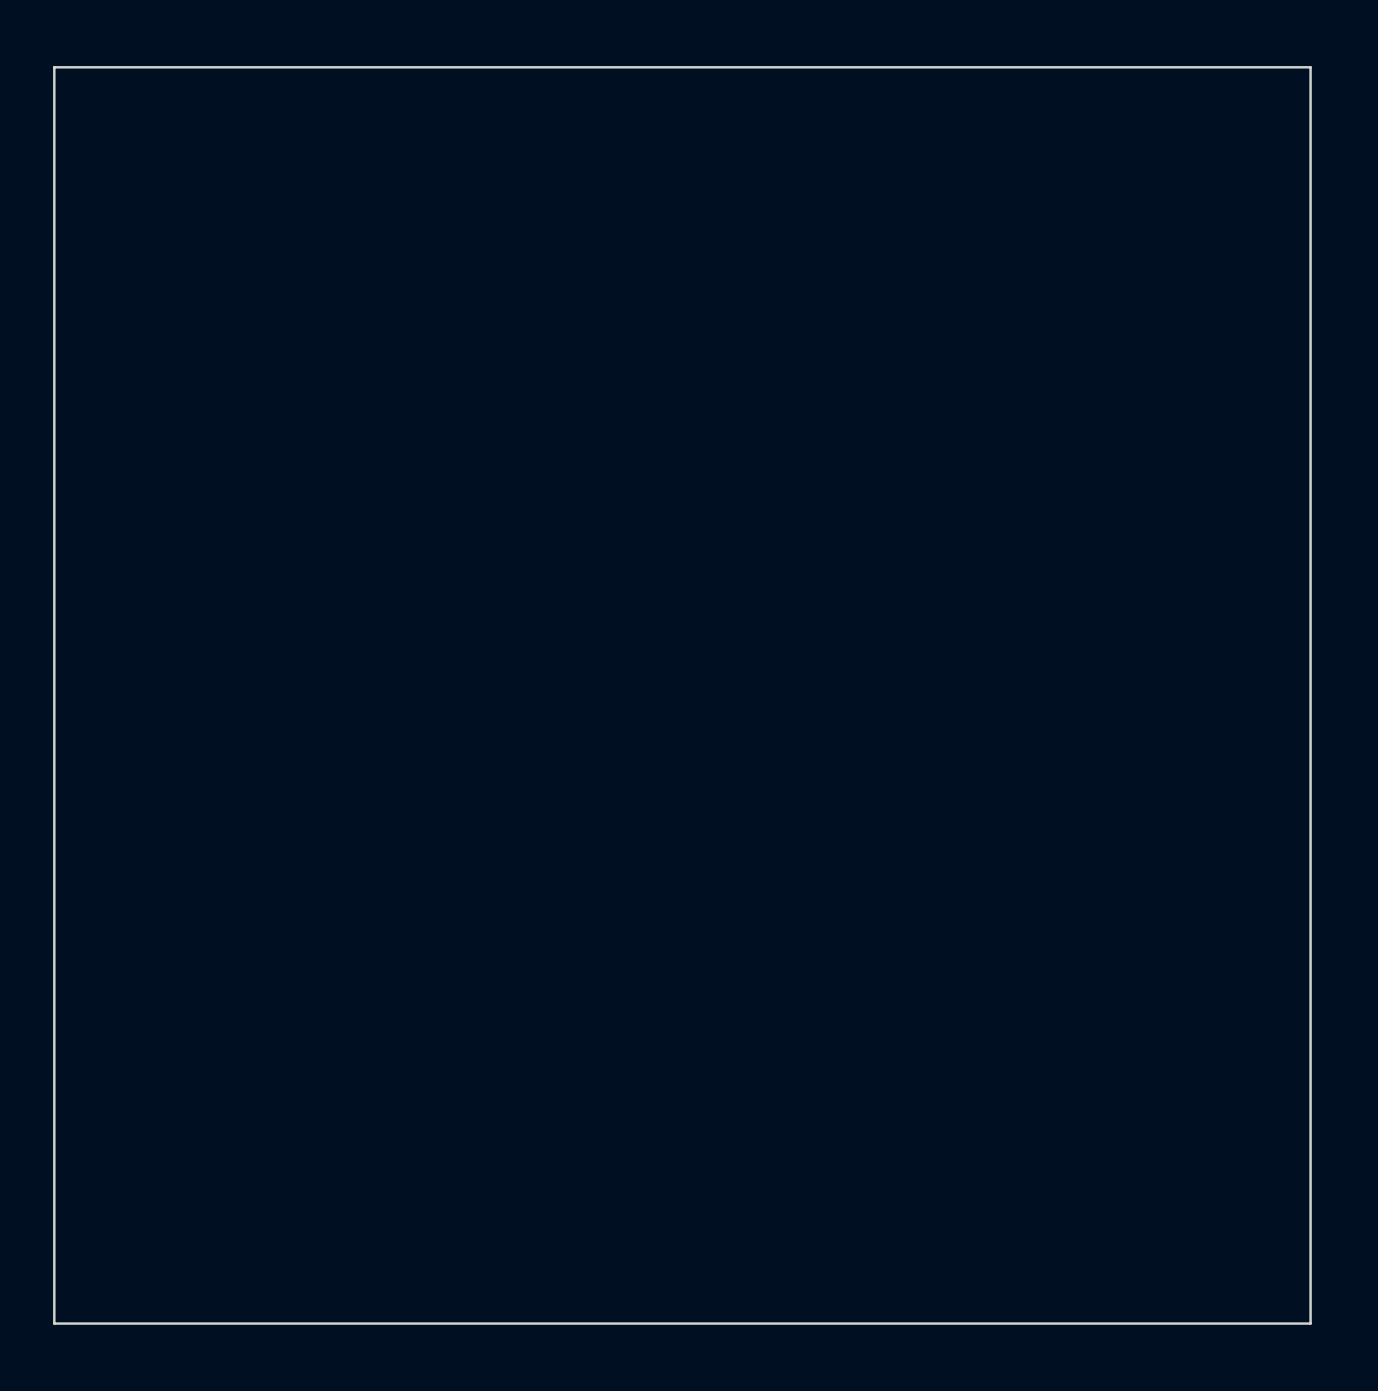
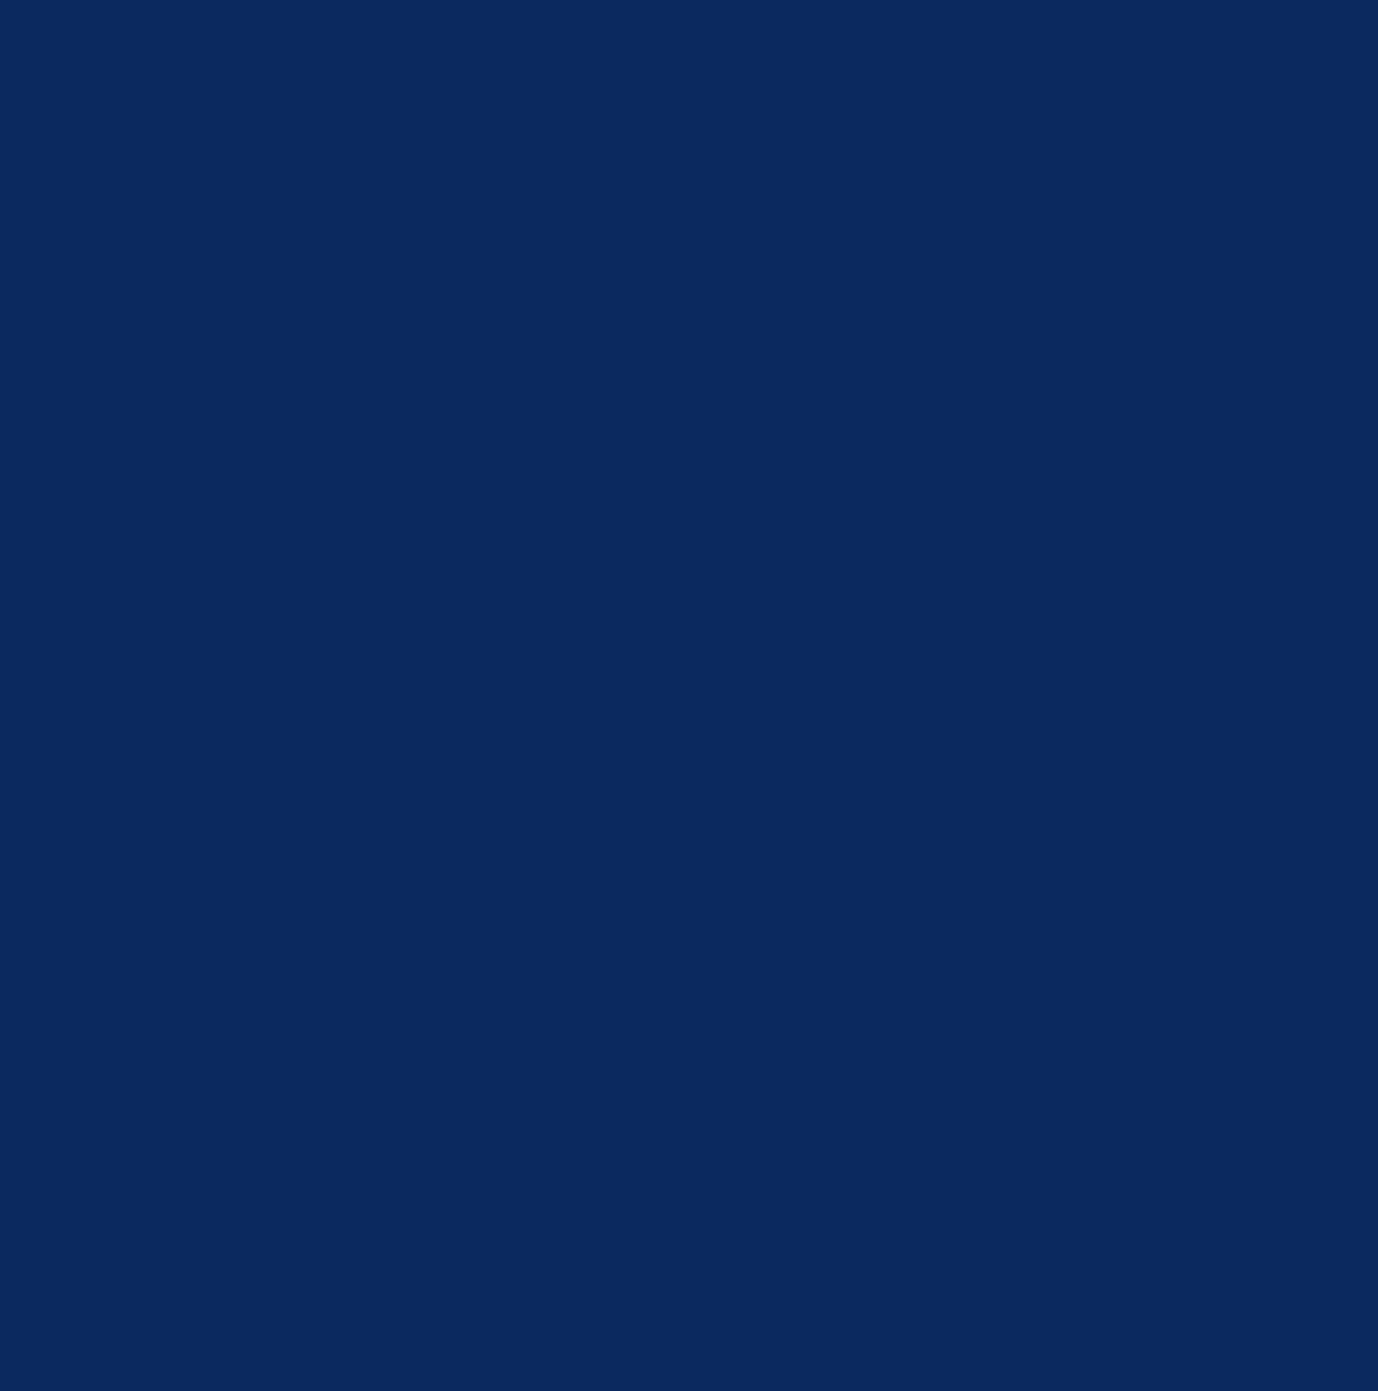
board edge: (1310, 67) (54, 67) (54, 1323) (1310, 1323) (1310, 67) -> none

